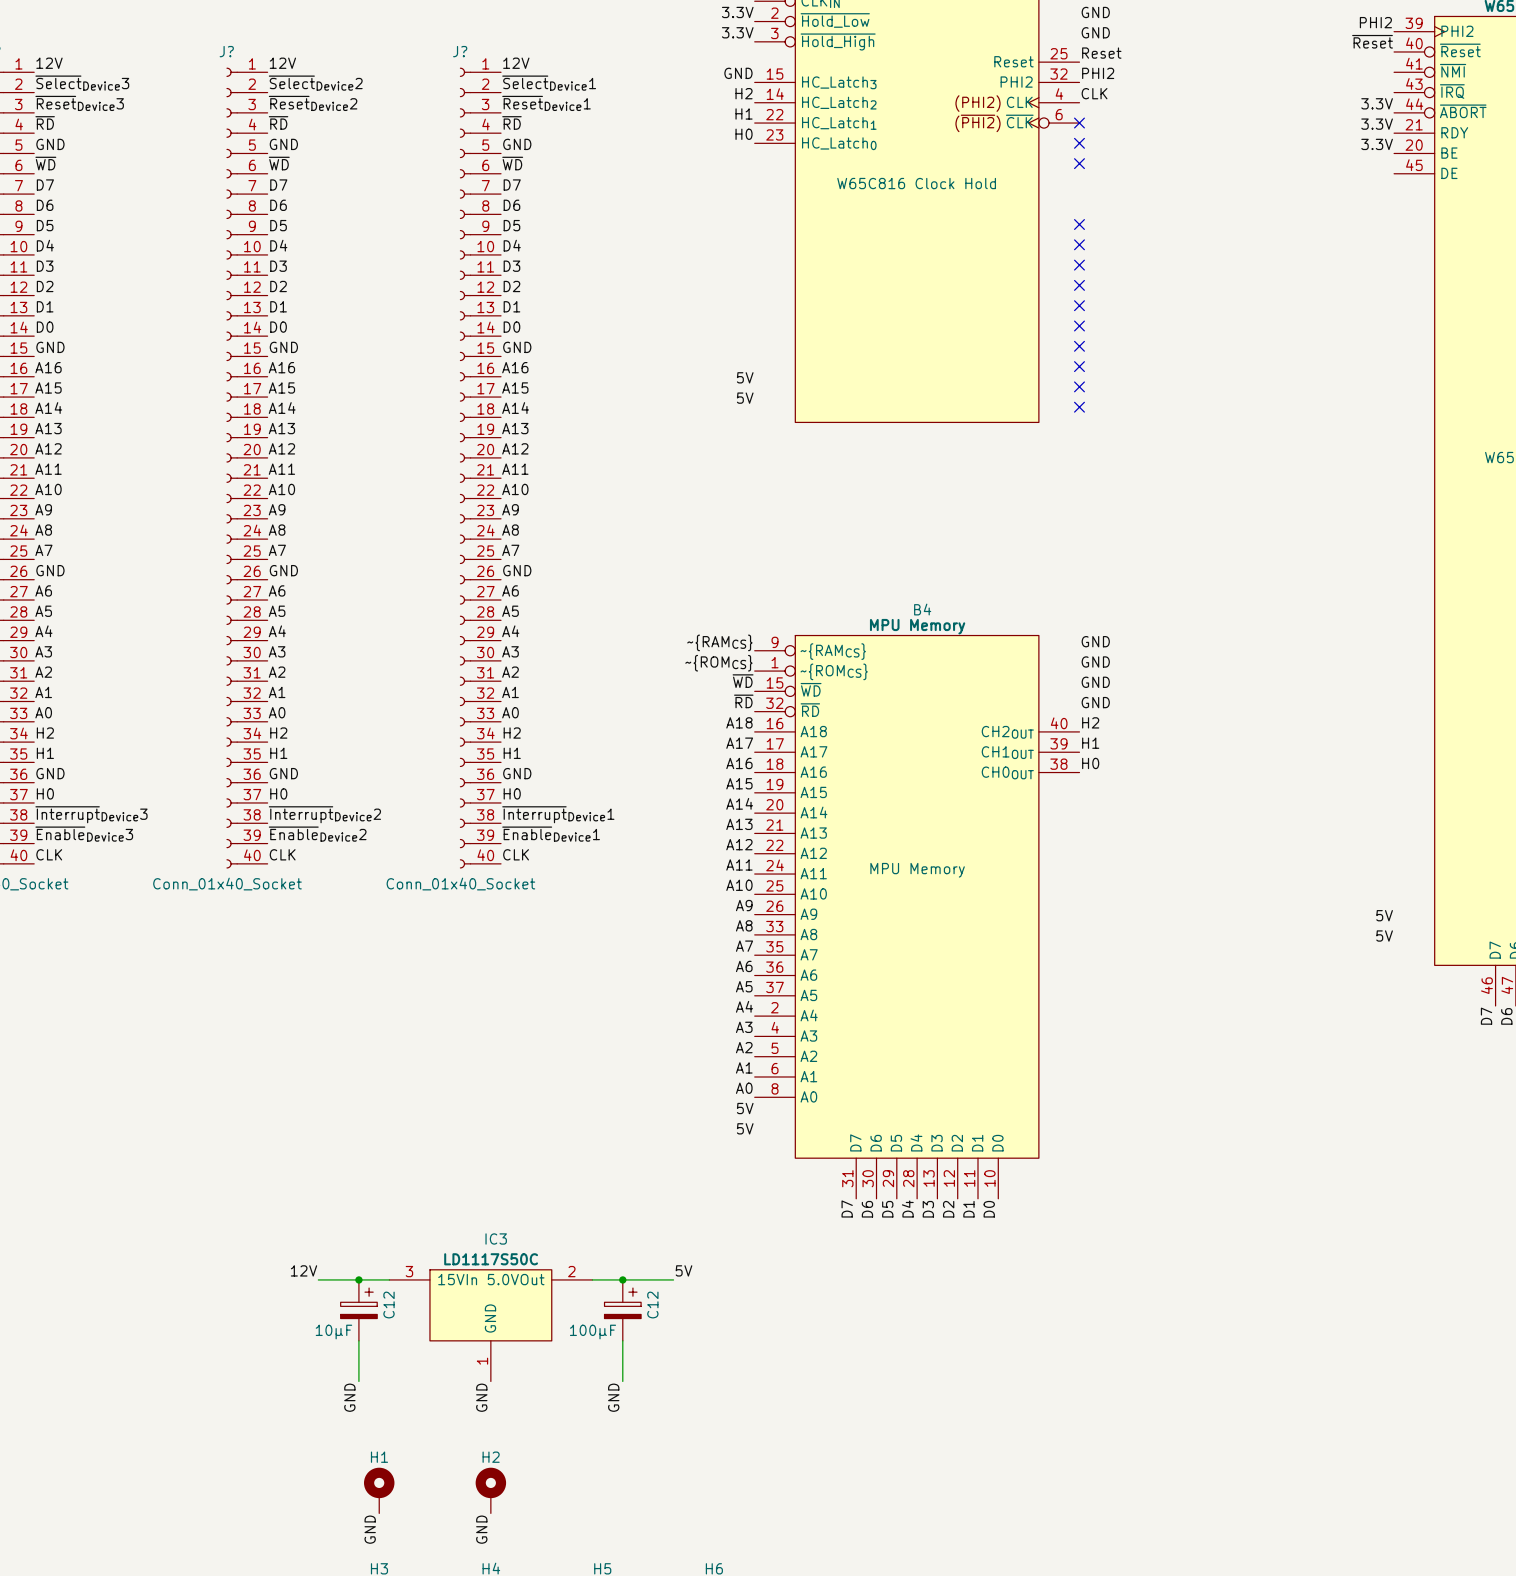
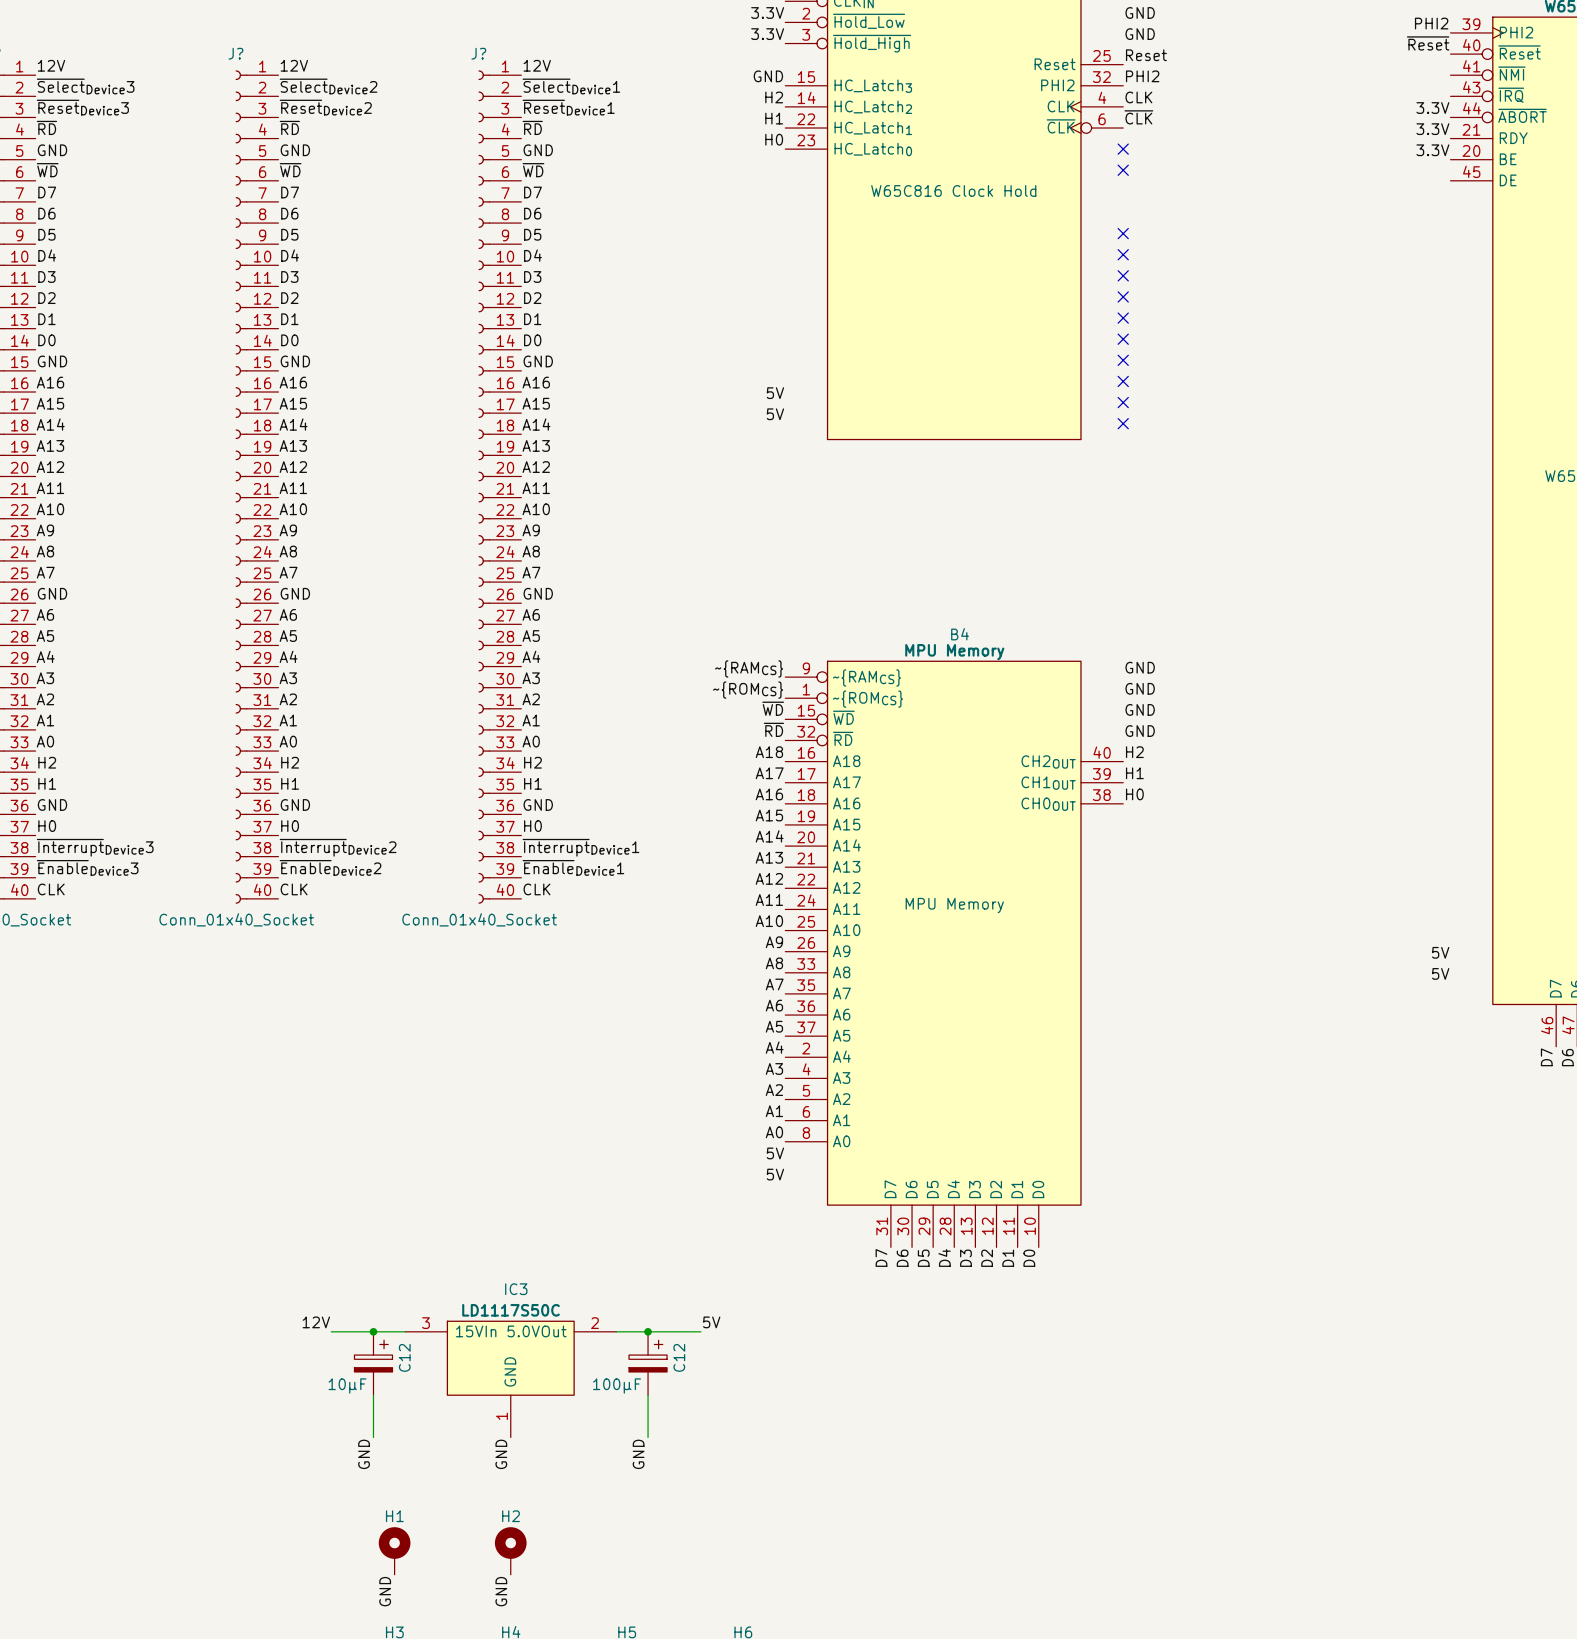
part text: (PHI2) (978, 103) -> none
label: none -> ~{CLK} (1138, 117)
part text: (~{PHI2}) (978, 123) -> none
no-connect mark: (1079, 123) -> none

